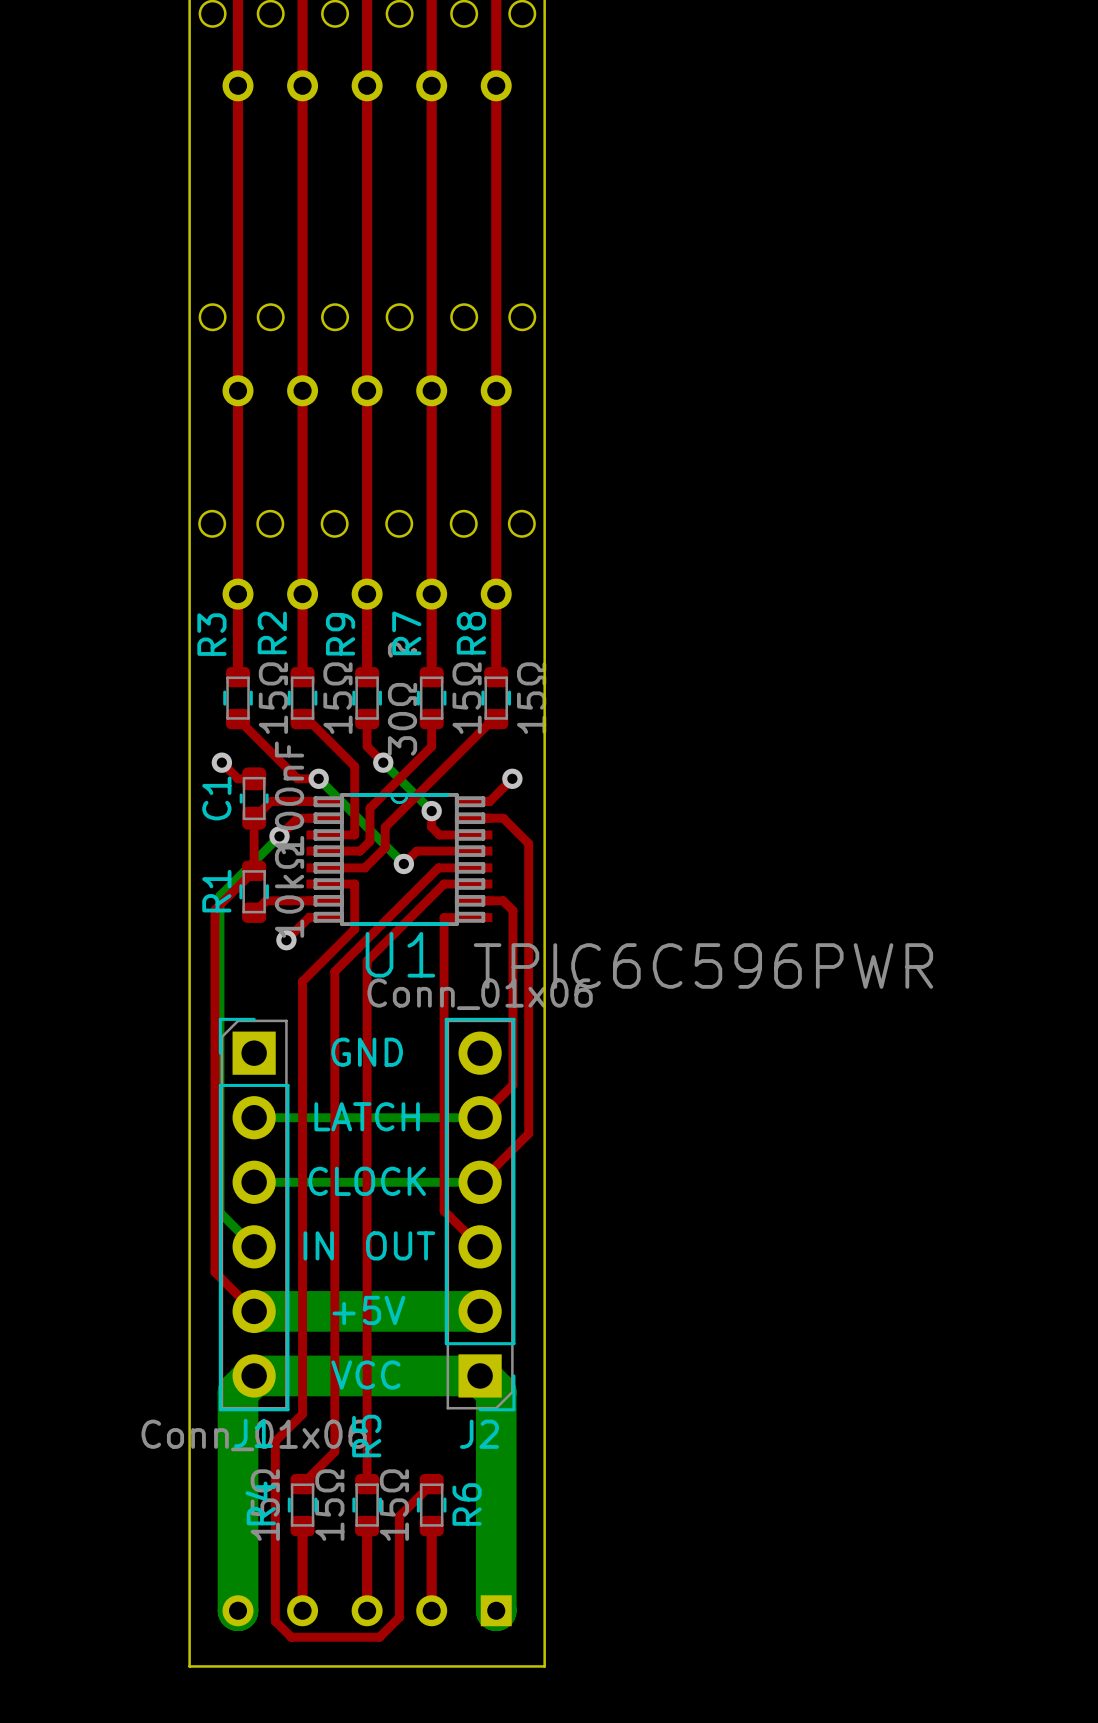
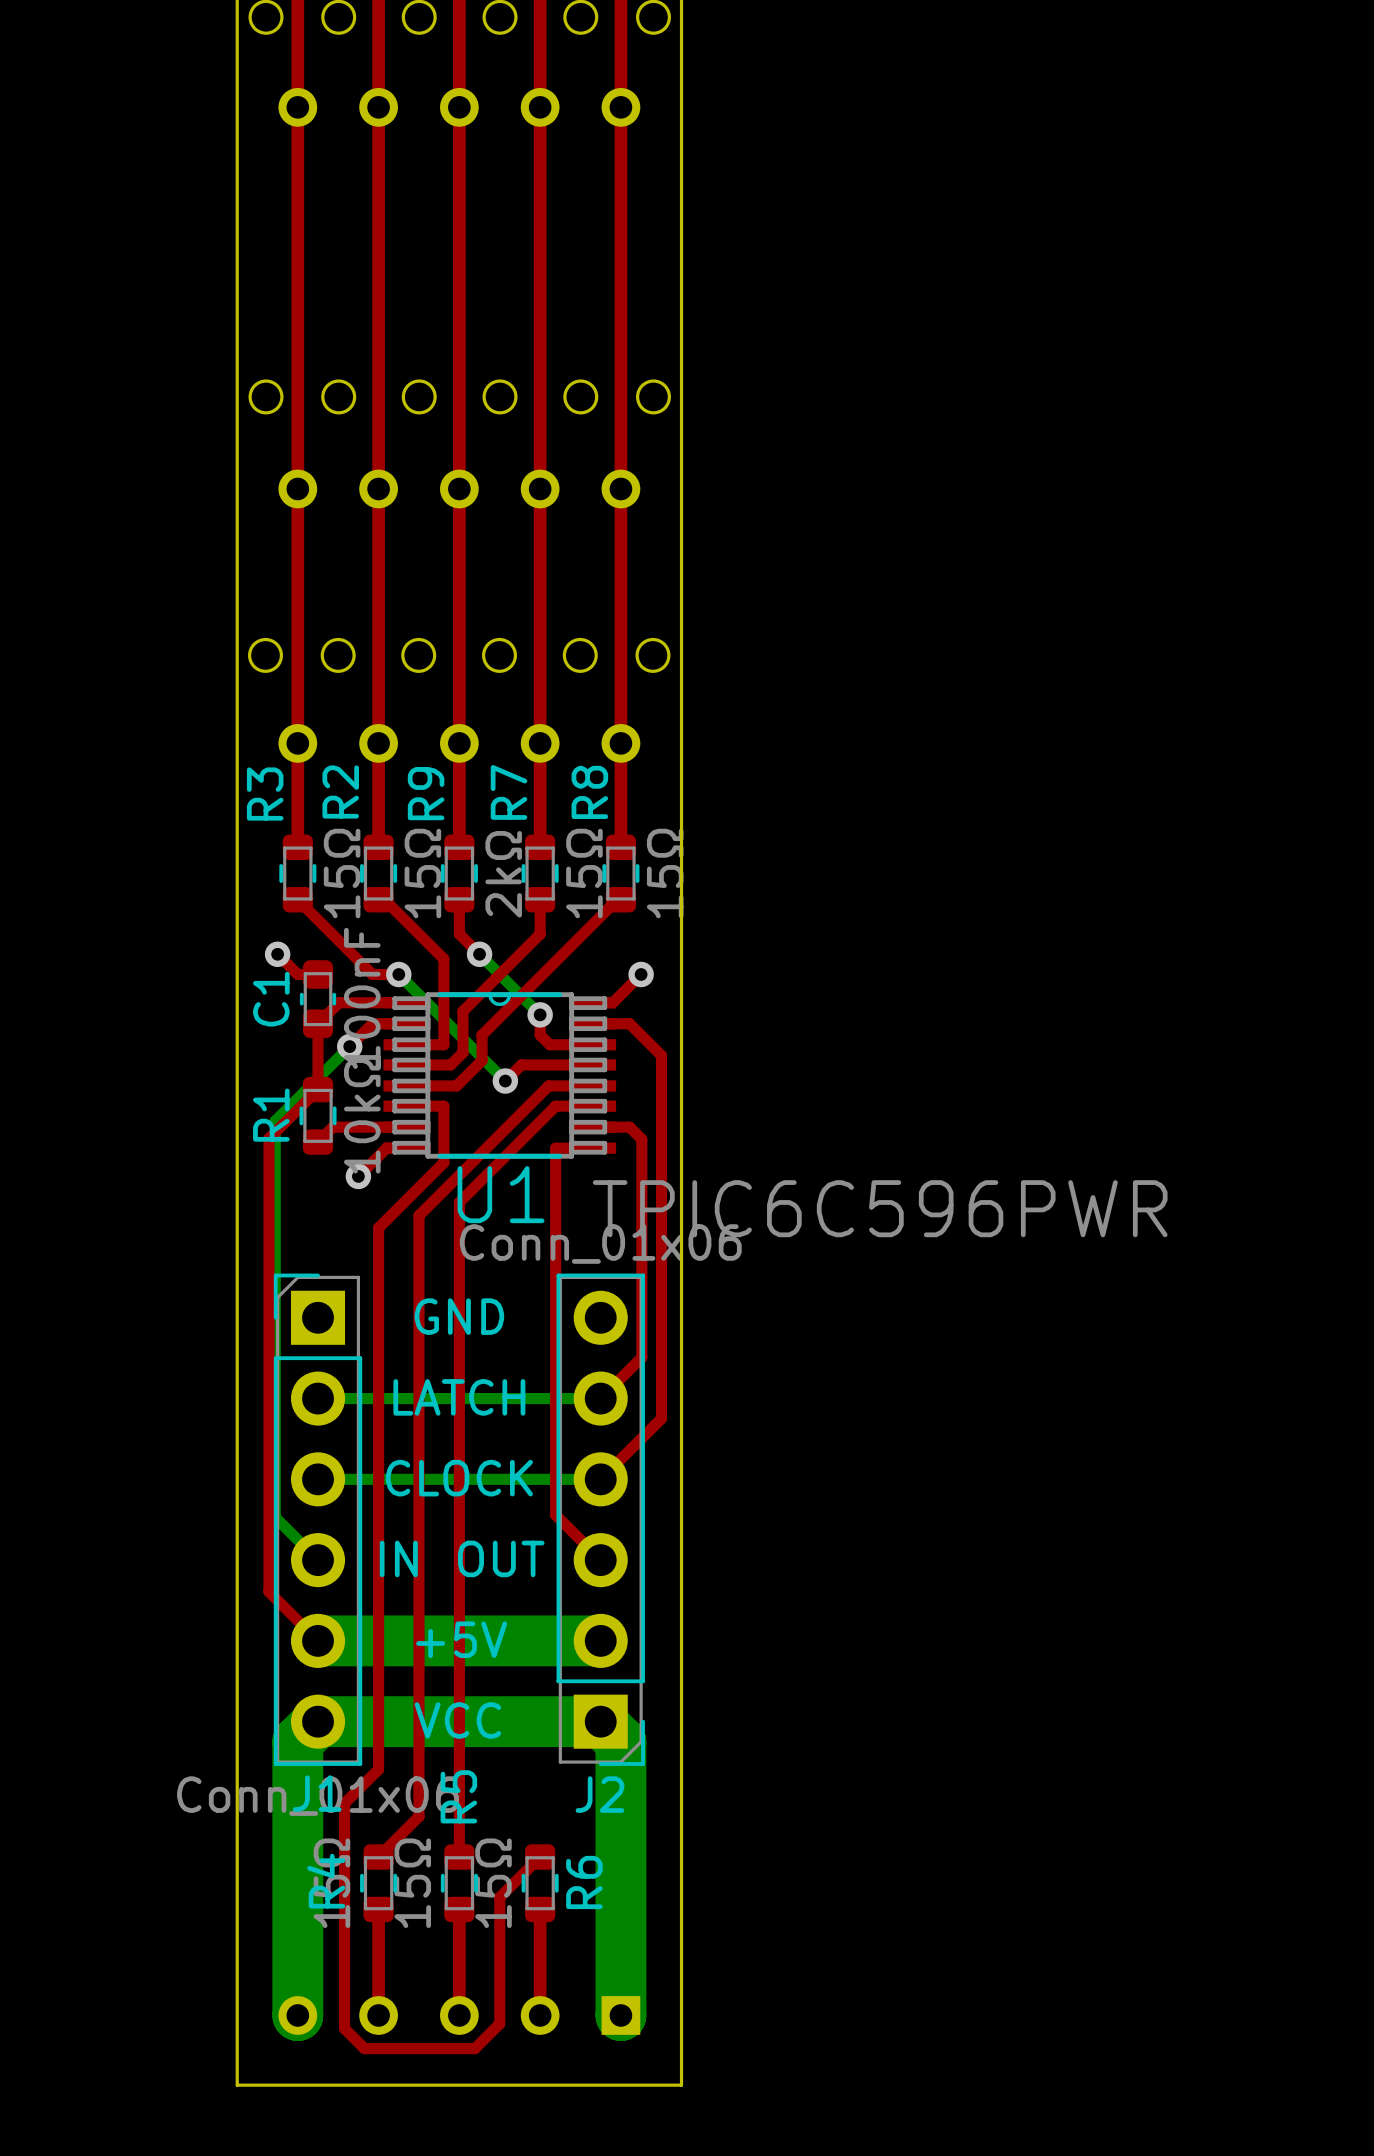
R9 value: 30Ω ? (402, 698) -> 2kΩ (503, 874)

